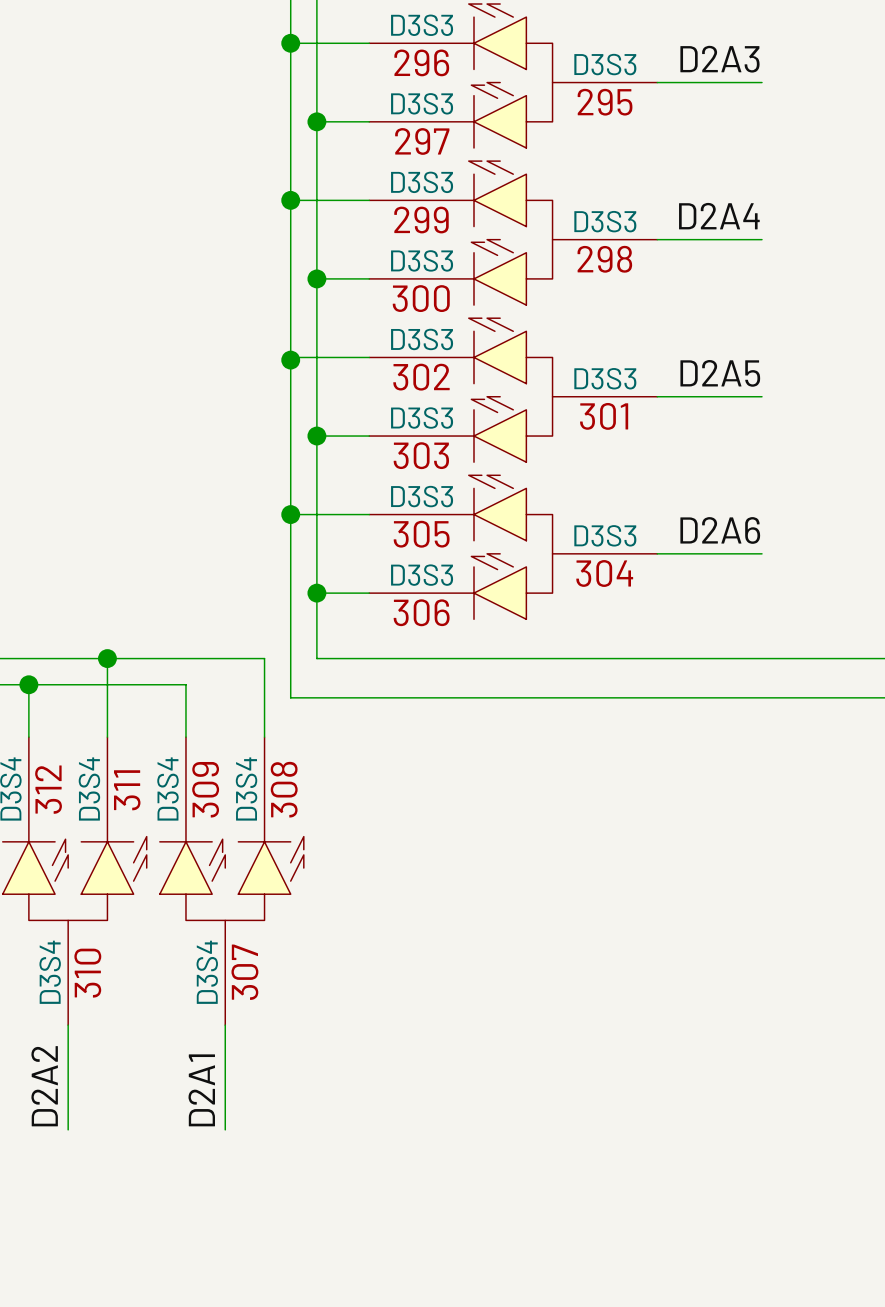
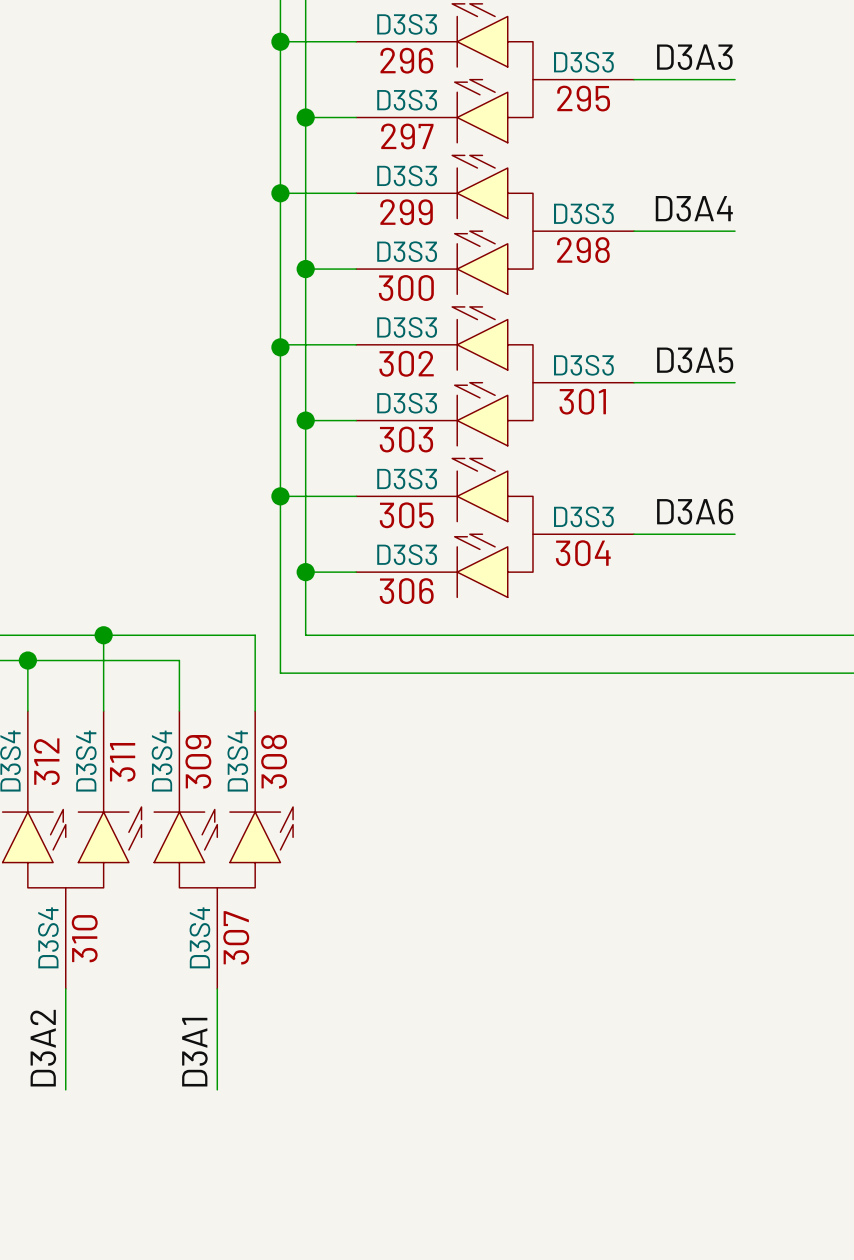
label: D2A3 (719, 59) -> D3A3 (694, 57)
label: D2A4 (719, 216) -> D3A4 (694, 208)
label: D2A5 (720, 373) -> D3A5 (695, 360)
label: D2A6 (720, 530) -> D3A6 (695, 511)
label: D2A2 (44, 1086) -> D3A2 (43, 1048)
label: D2A1 (201, 1090) -> D3A1 (194, 1052)

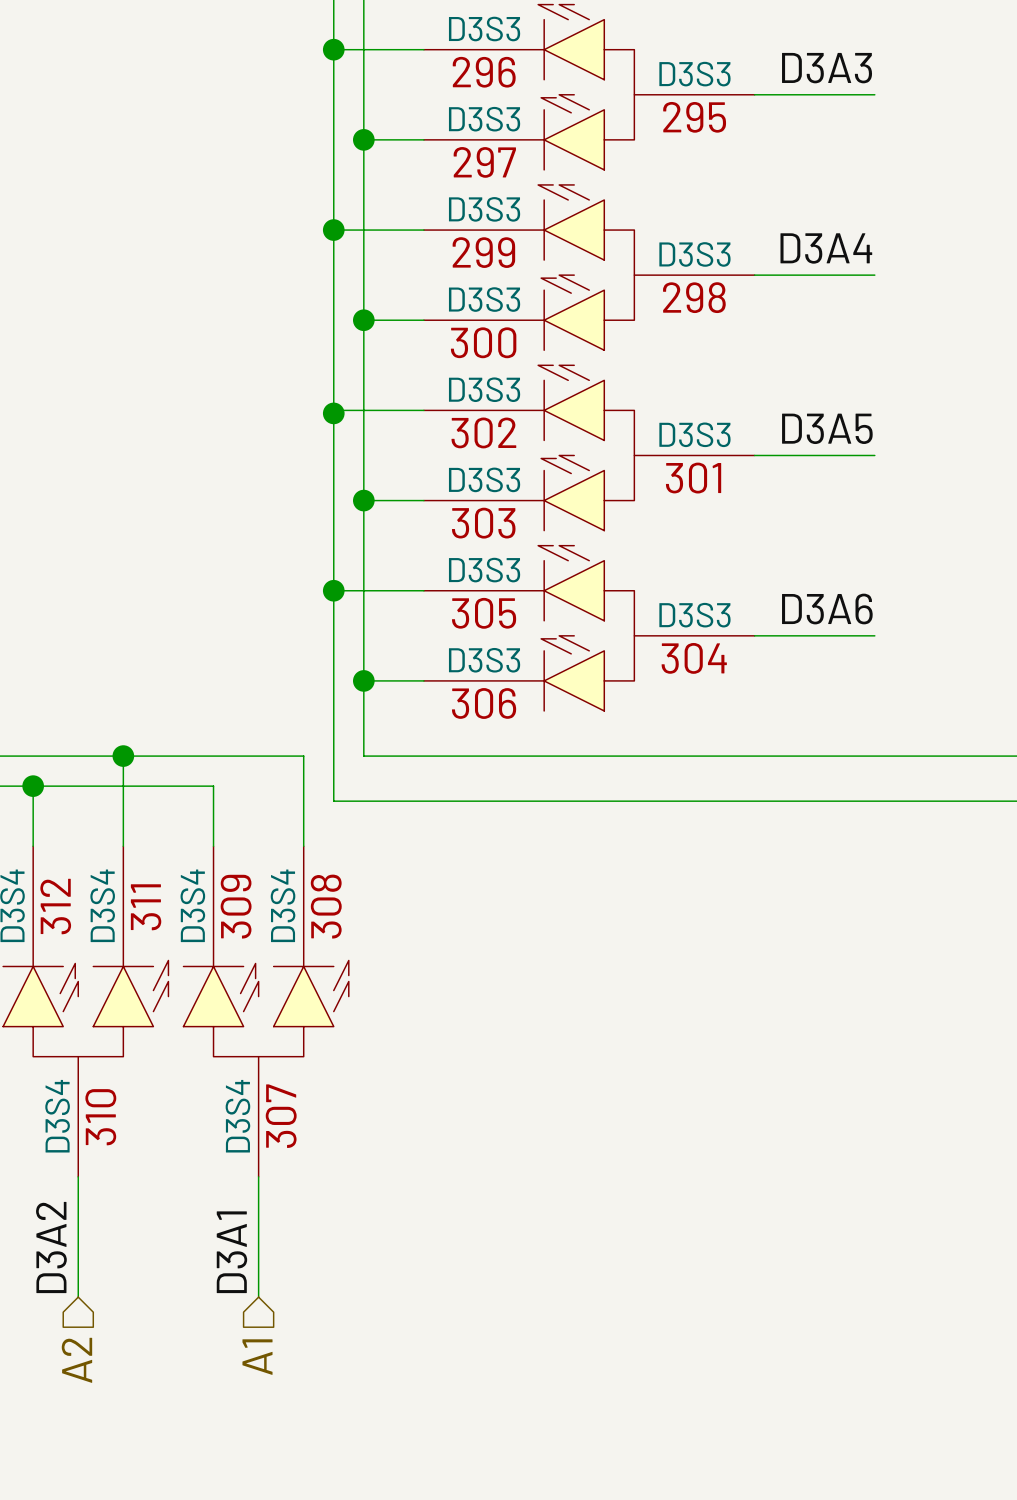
hierarchical label: none -> A1 (257, 1357)
hierarchical label: none -> A2 (76, 1360)

